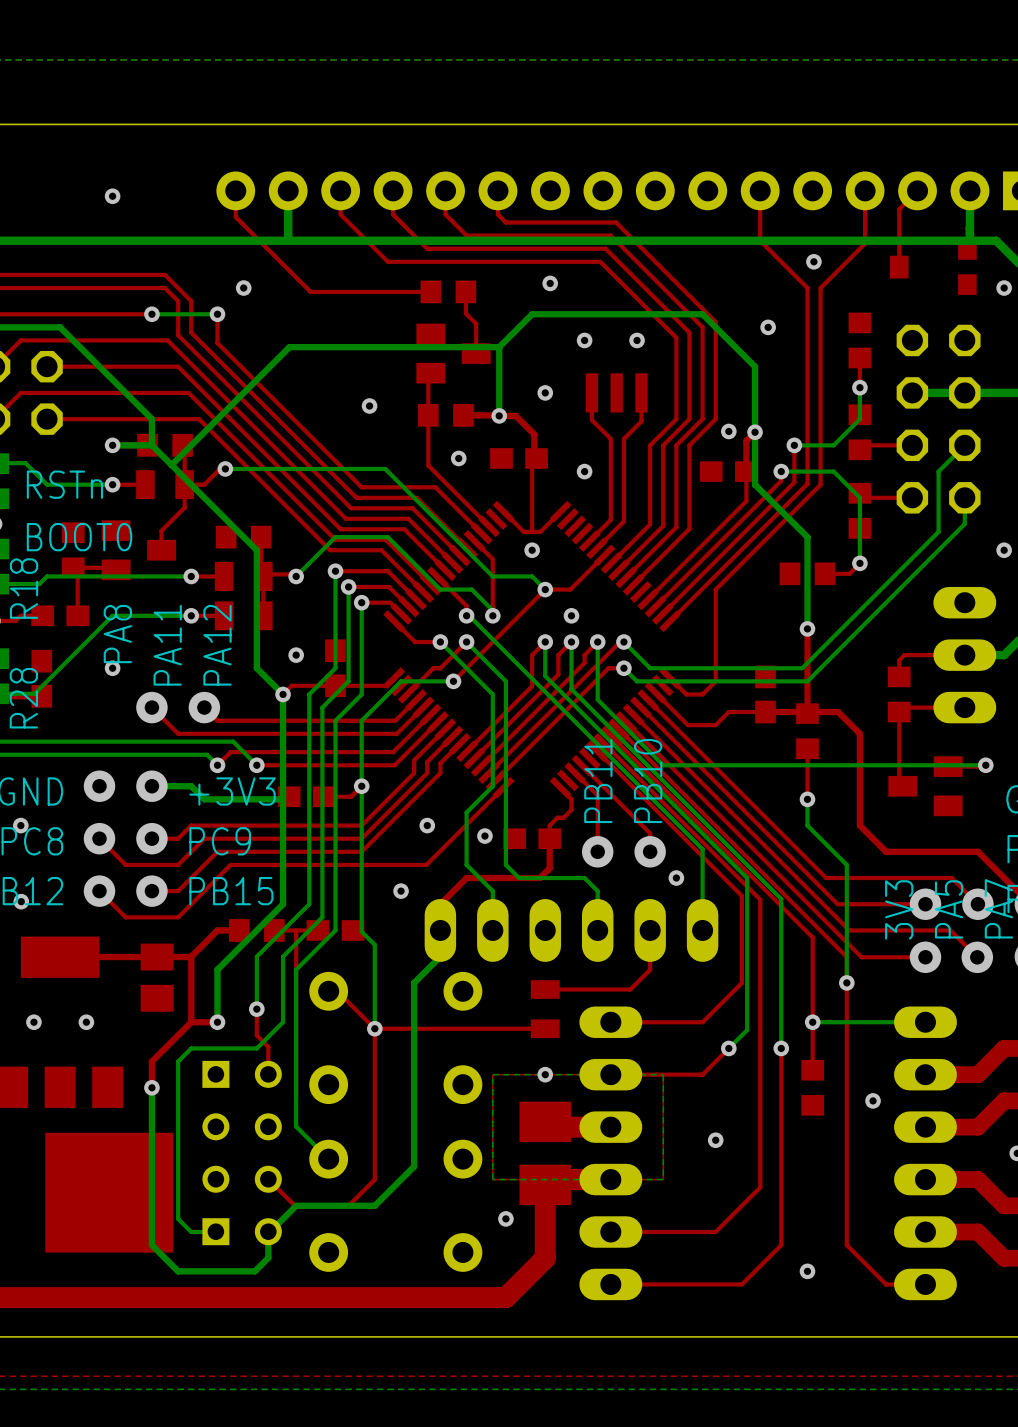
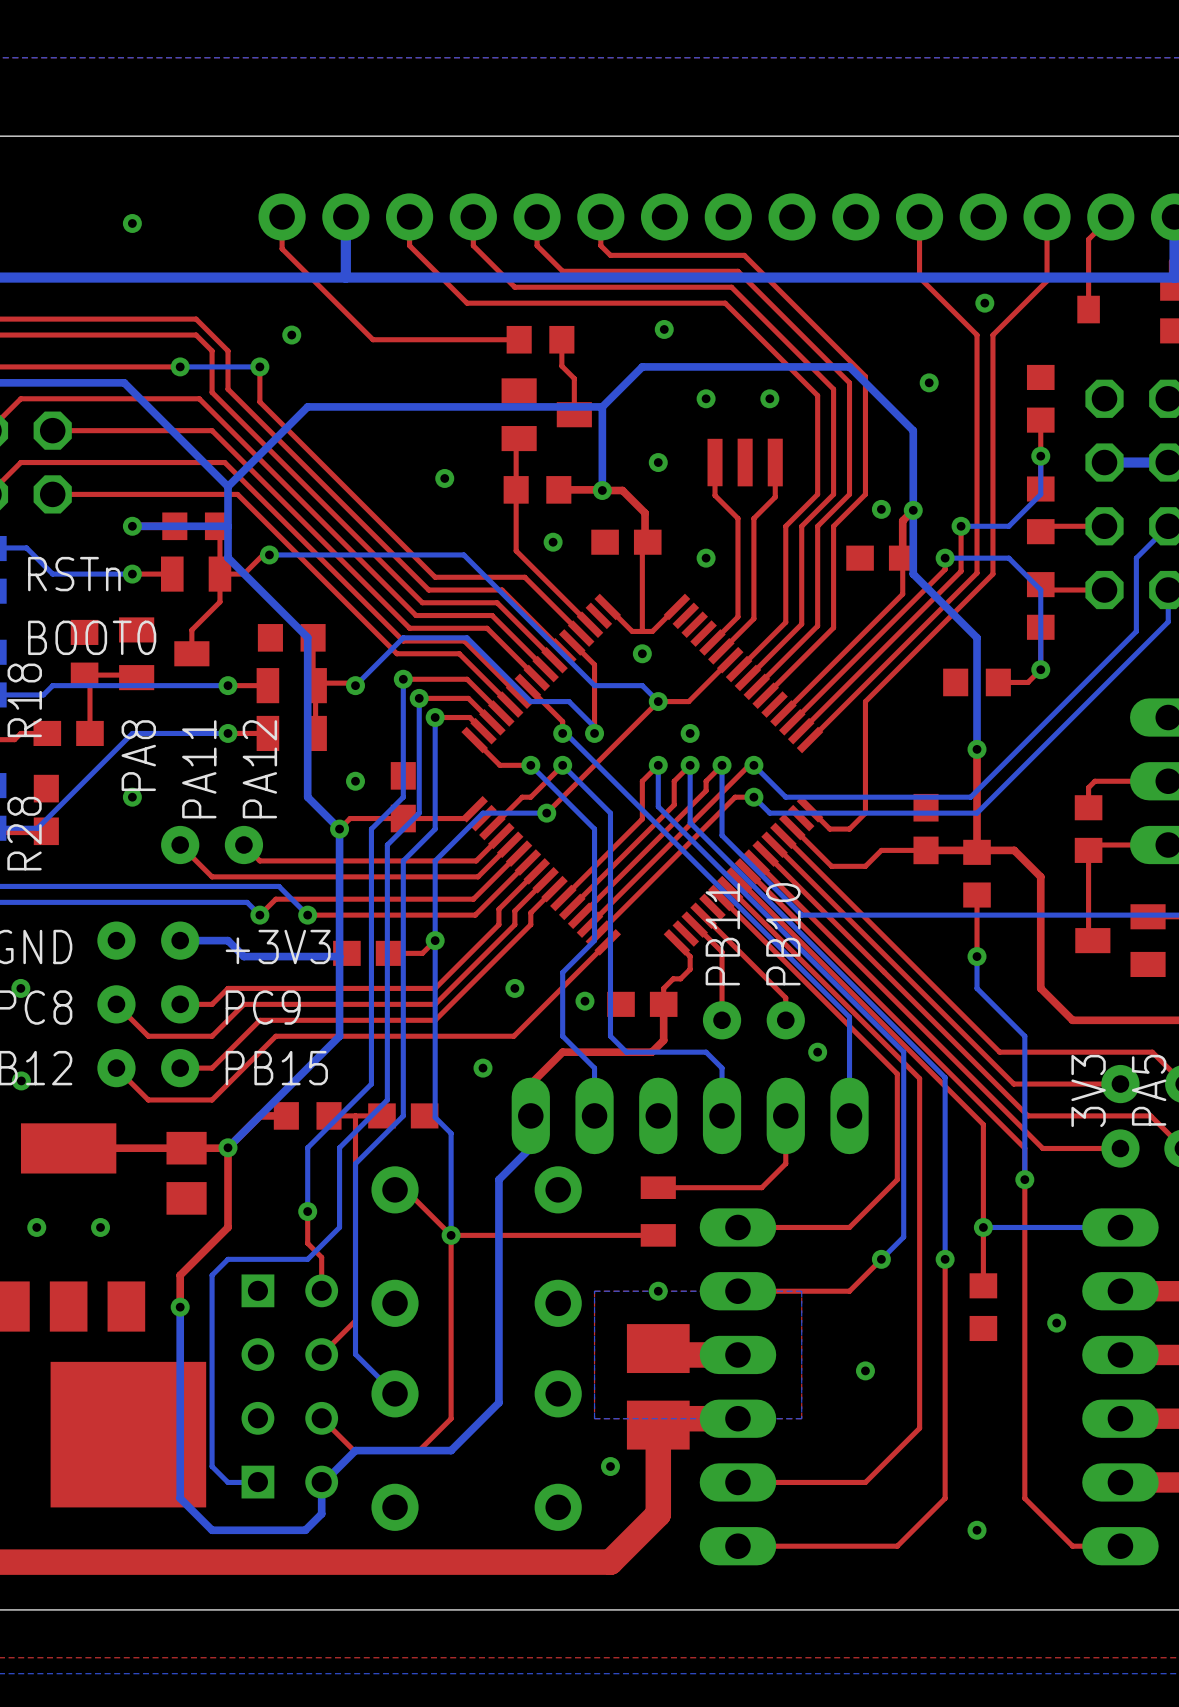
bottom track: (60, 327) (151, 419) (151, 445) (256, 550) -> (68, 382) (124, 382) (228, 486)
bottom track: (289, 347) (171, 465) -> (347, 406) (307, 406) (228, 486)
bottom track: none -> (228, 486) (228, 557) (307, 637) (307, 653)
bottom track: none -> (228, 526) (180, 526)
bottom track: (283, 864) (283, 904) (217, 969) (217, 1022) -> (339, 1036) (228, 1147)
top track: (217, 1022) (191, 1022) -> none
via position: (217, 1022) -> (228, 1147)
top track: none -> (355, 1320) (321, 1354)

